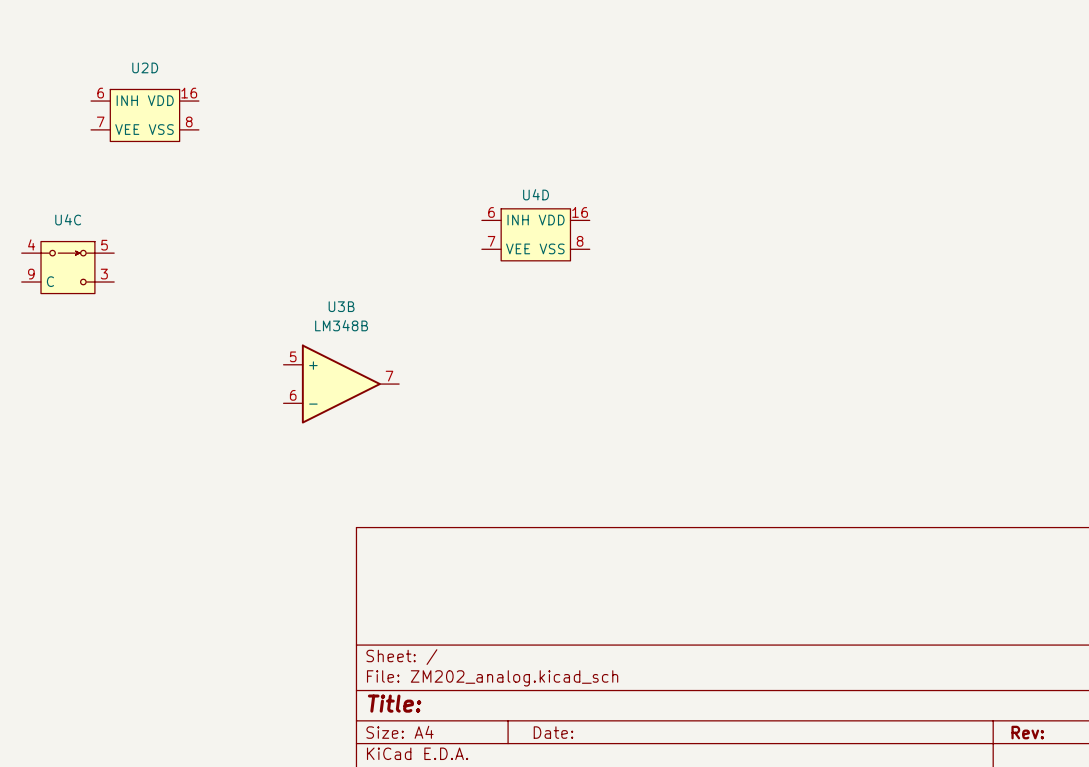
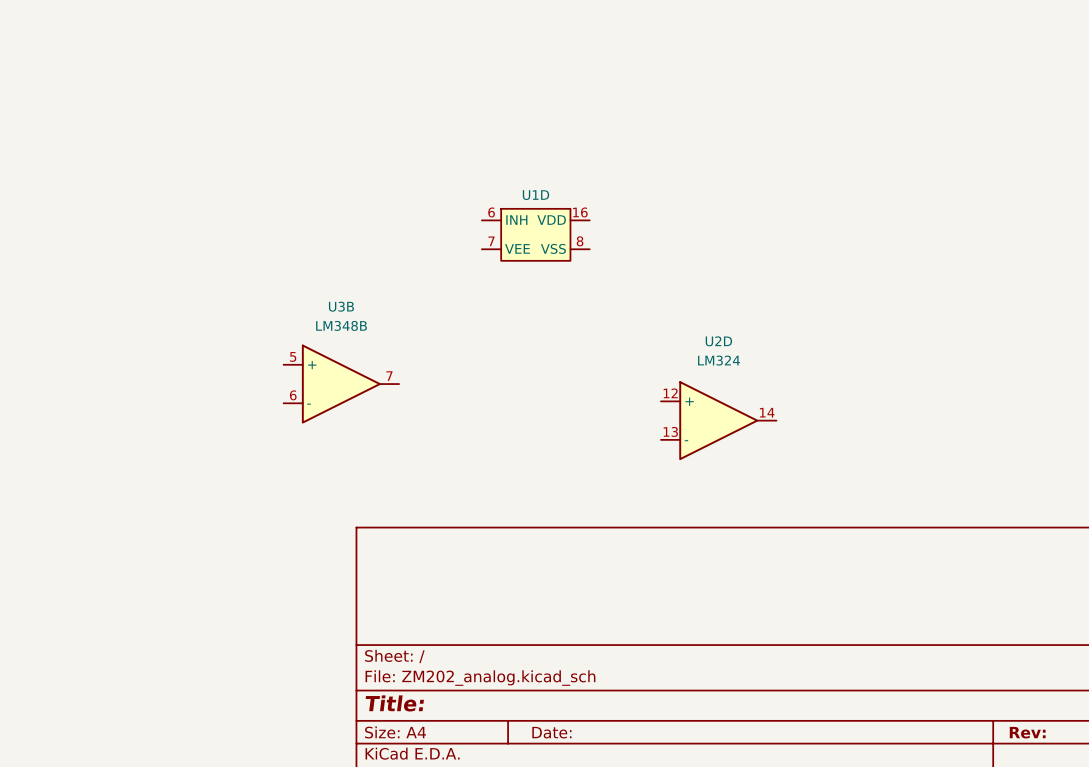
U2D name position: U2D (145, 67) -> U2D (718, 341)
U2D symbol: [91, 89, 199, 142] -> [660, 381, 777, 461]
U4D name: U4D (536, 194) -> U1D (535, 195)
U4C: (67, 267) -> none
U2D value: none -> LM324 (718, 360)

